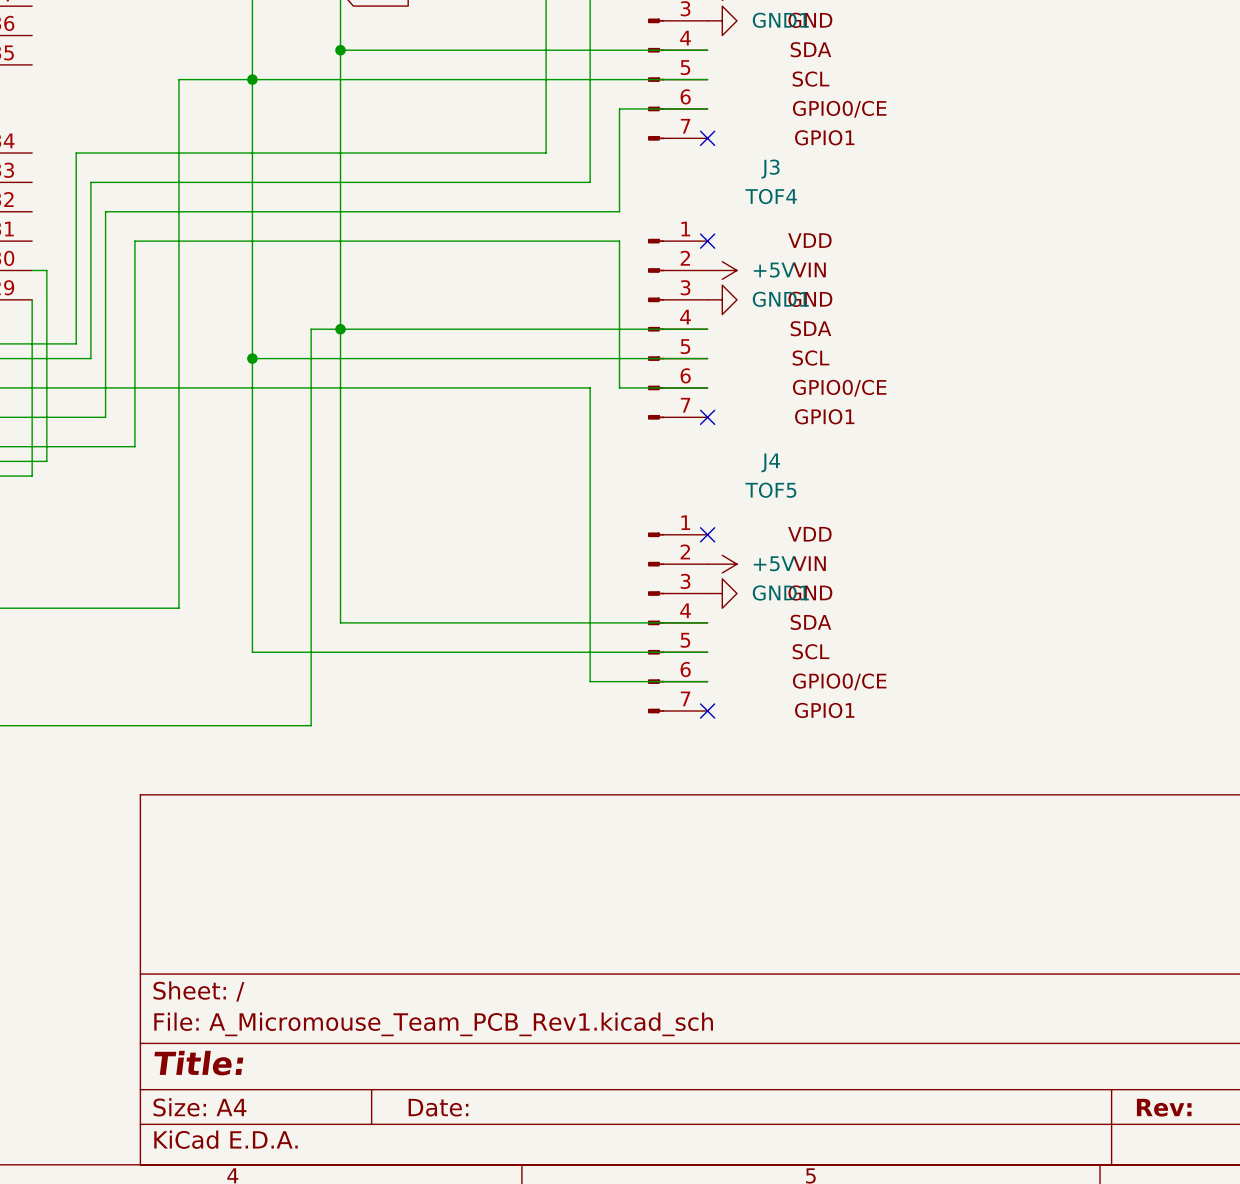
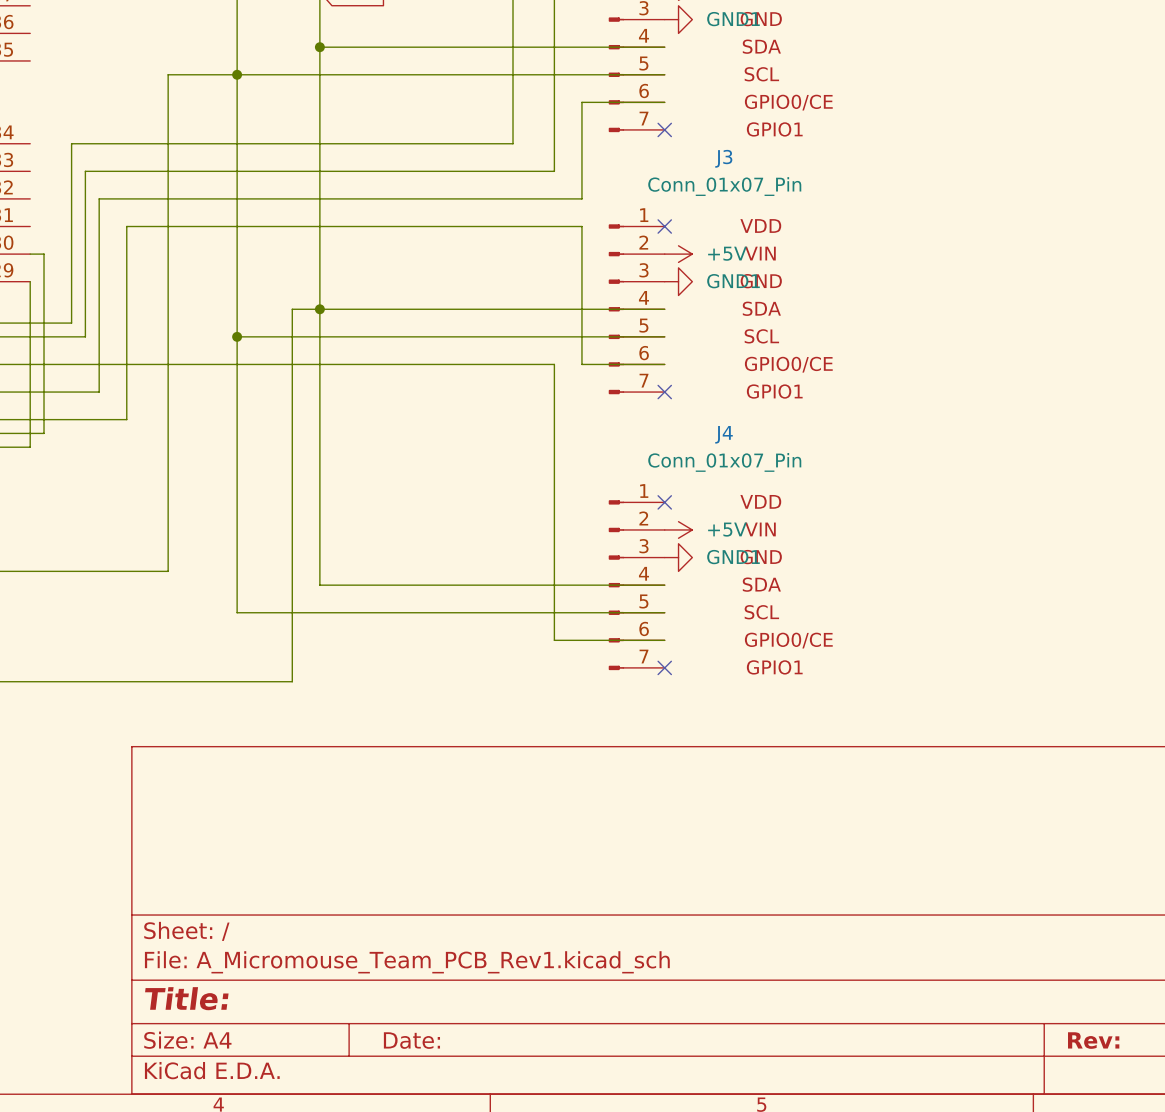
J3 value: TOF4 (771, 196) -> Conn_01x07_Pin (724, 186)
J4 value: TOF5 (770, 490) -> Conn_01x07_Pin (724, 462)

